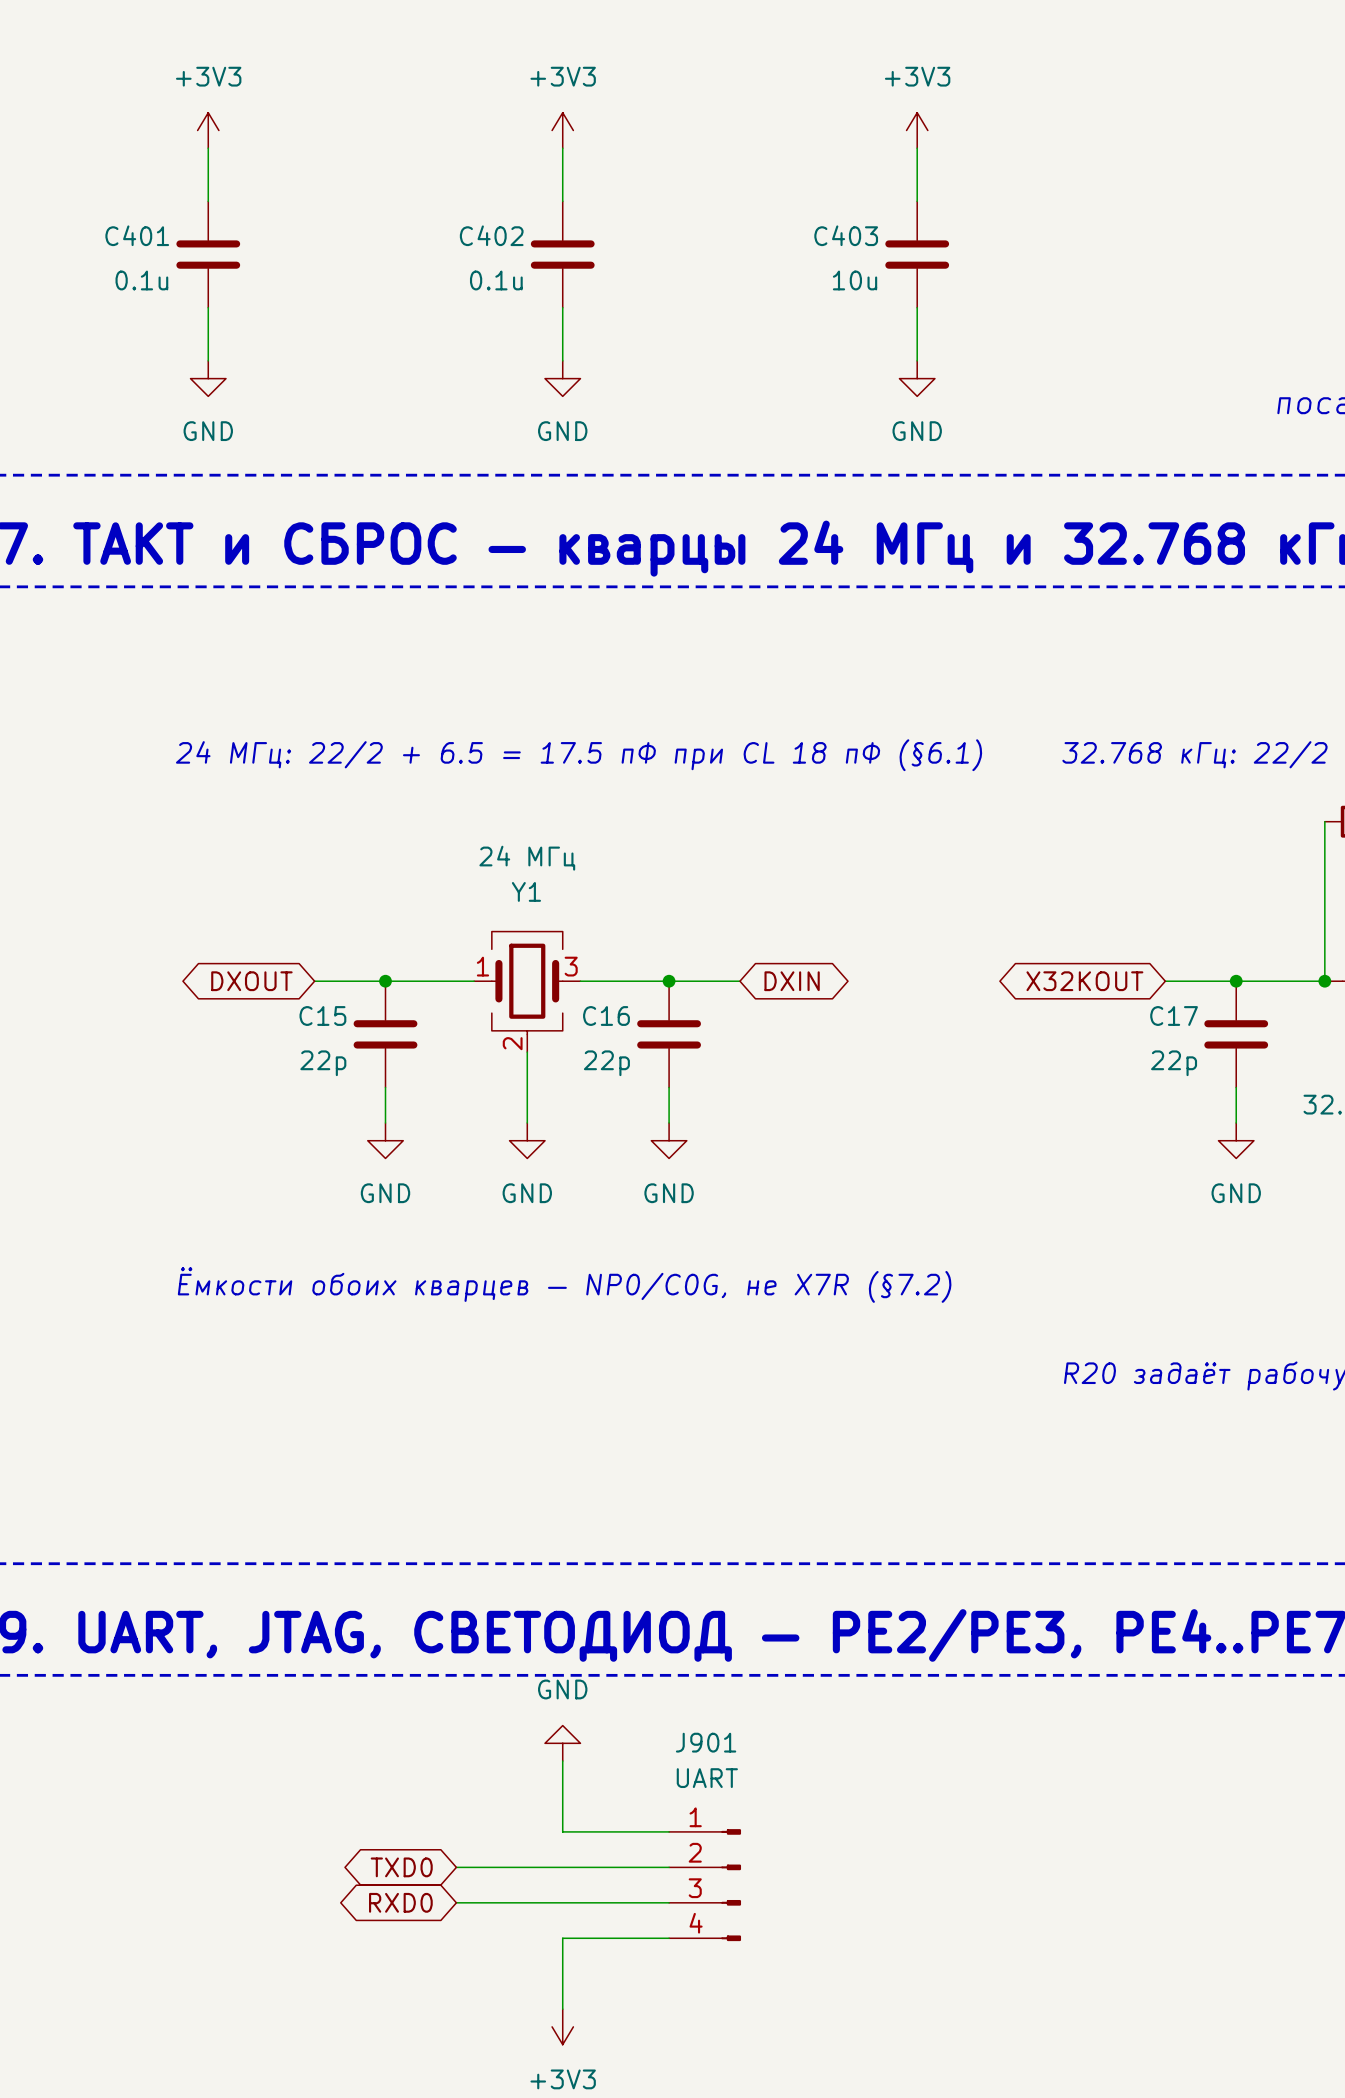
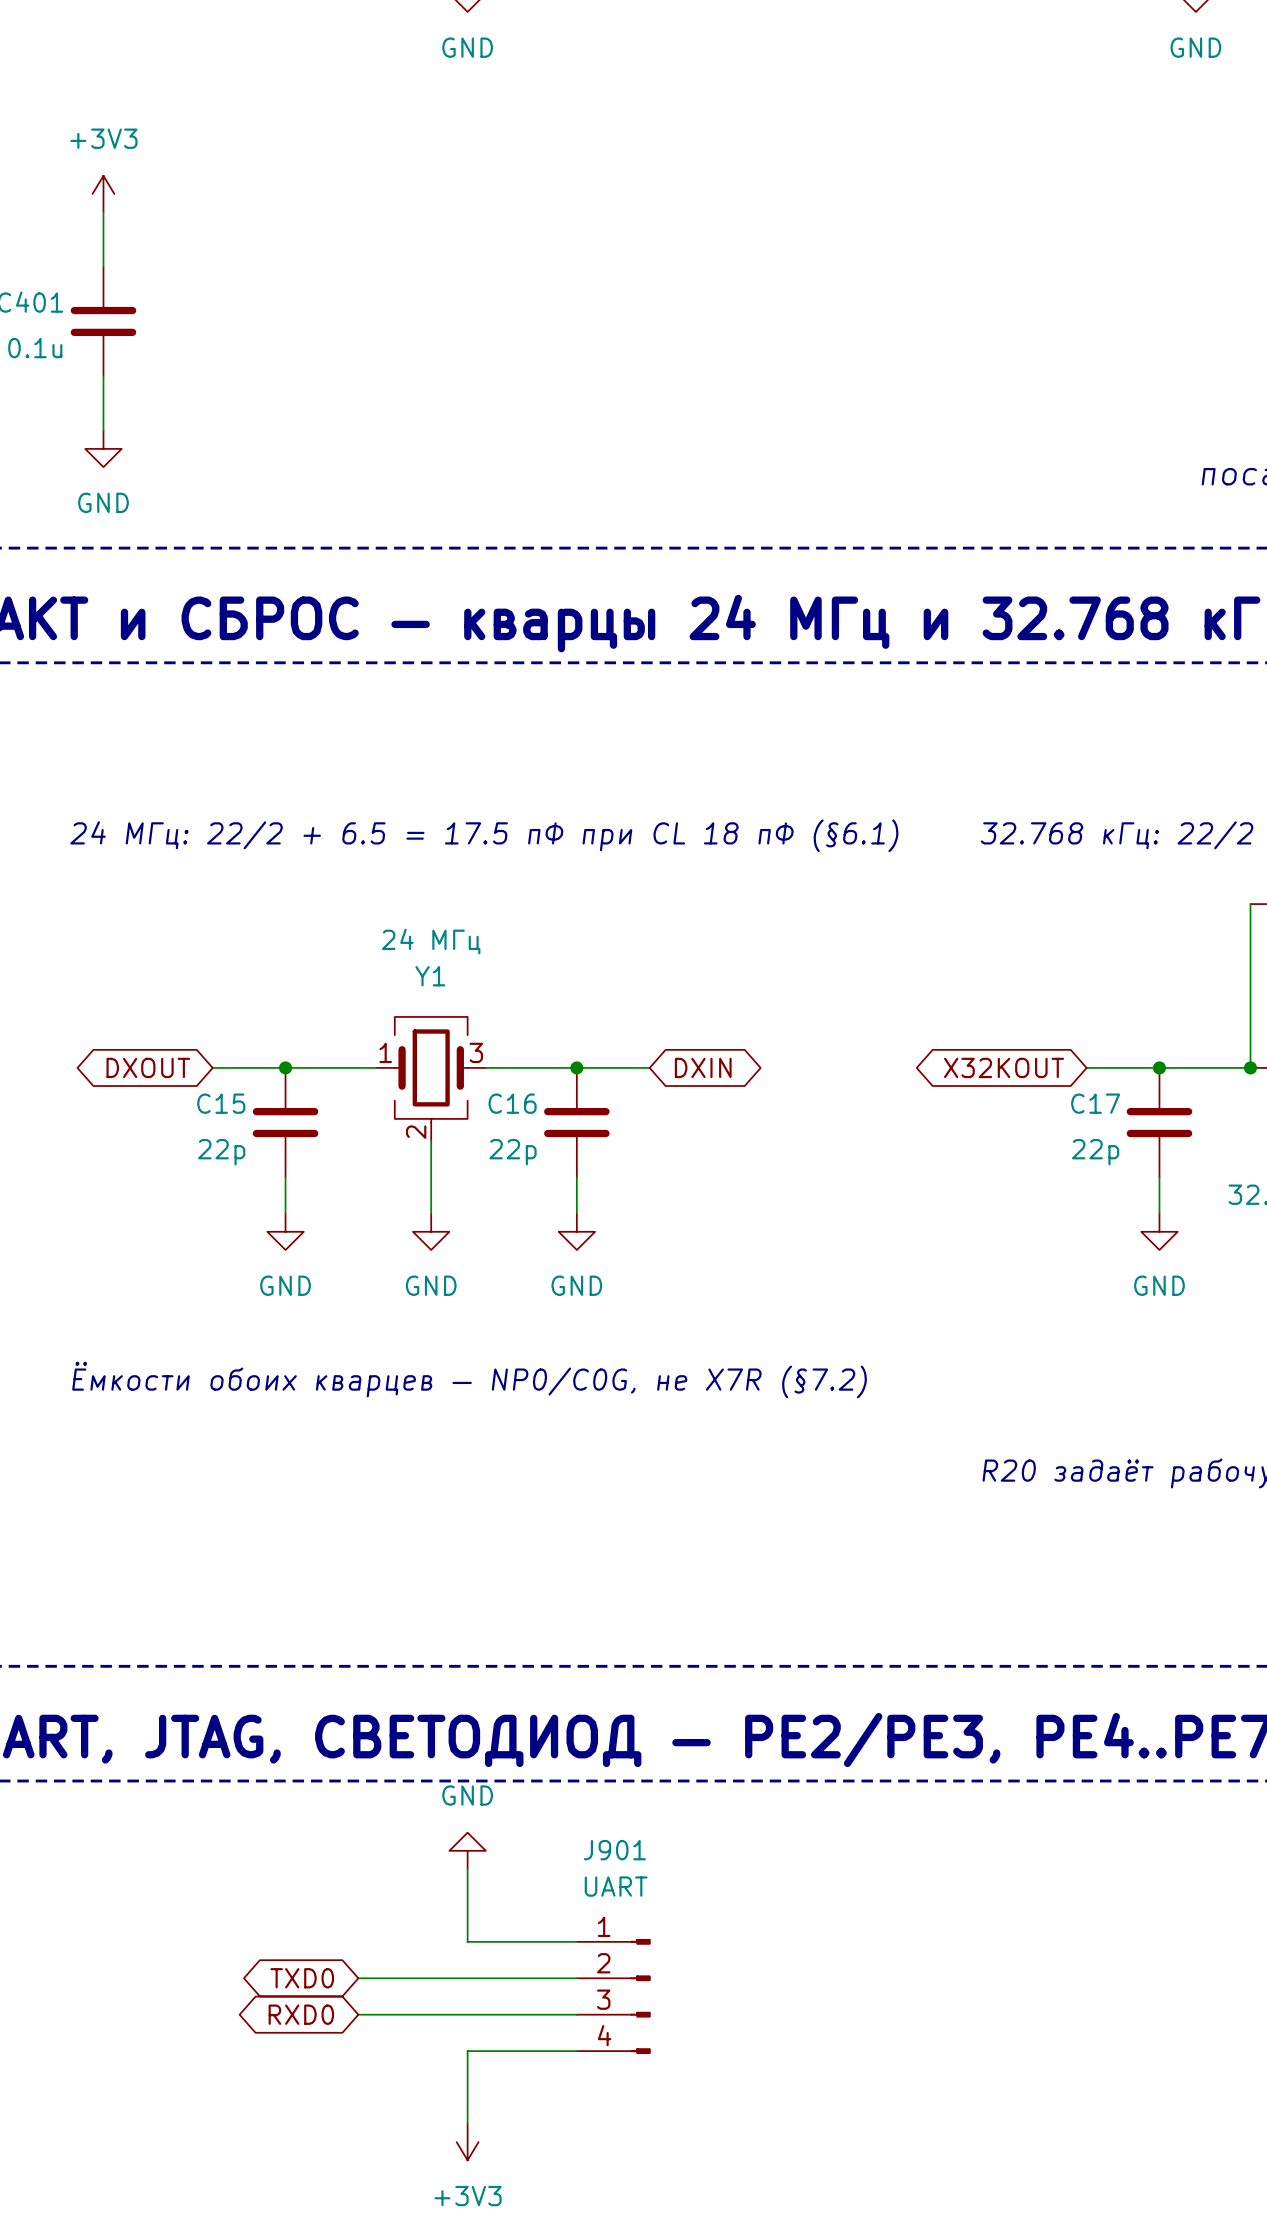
power symbol: +3V3 (562, 130) -> none
power symbol: +3V3 (917, 130) -> none
wire: (562, 148) (562, 201) -> none
wire: (917, 148) (917, 201) -> none
C402: 0.1u (562, 254) -> none
C403: 10u (917, 254) -> none
wire: (562, 307) (562, 360) -> none
wire: (917, 307) (917, 360) -> none
power symbol: GND (562, 378) -> none
power symbol: GND (917, 378) -> none

